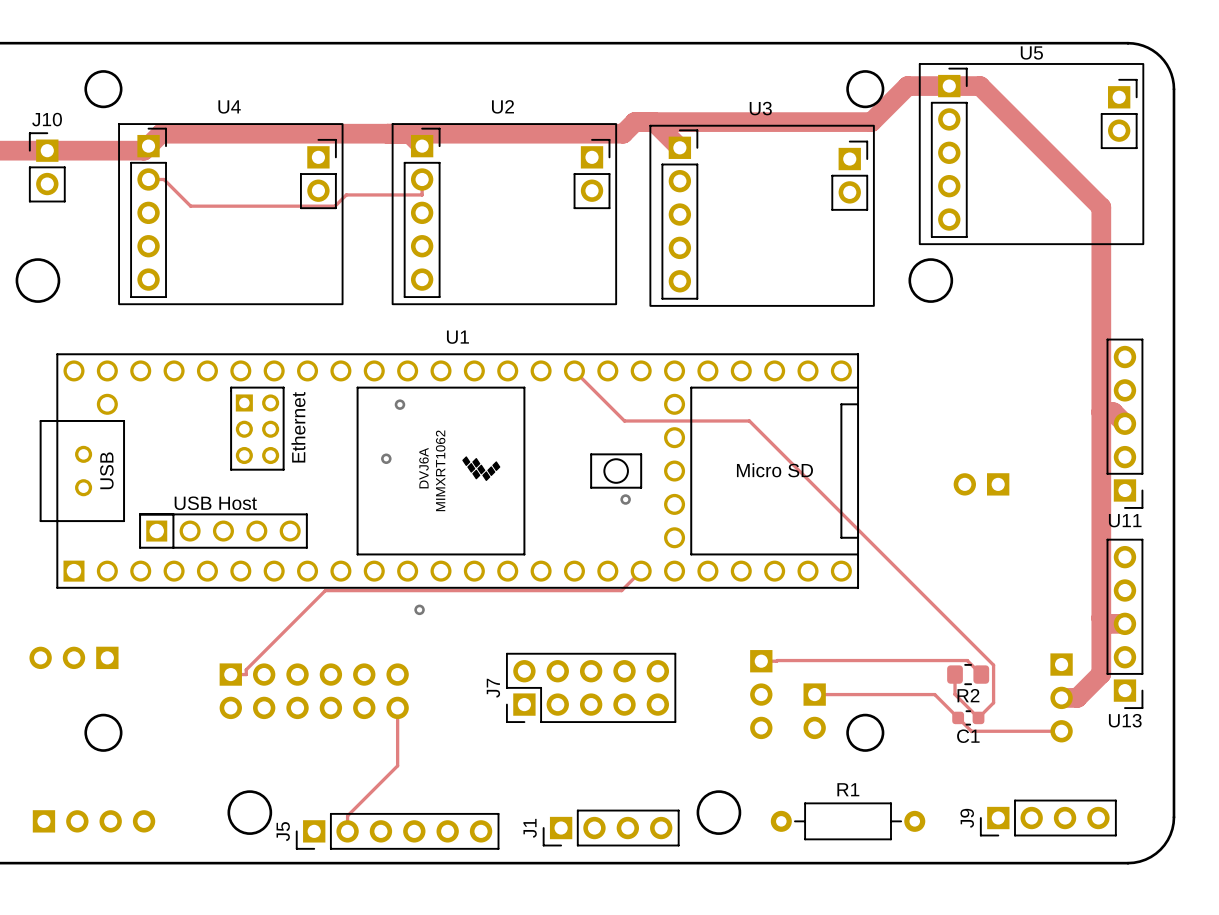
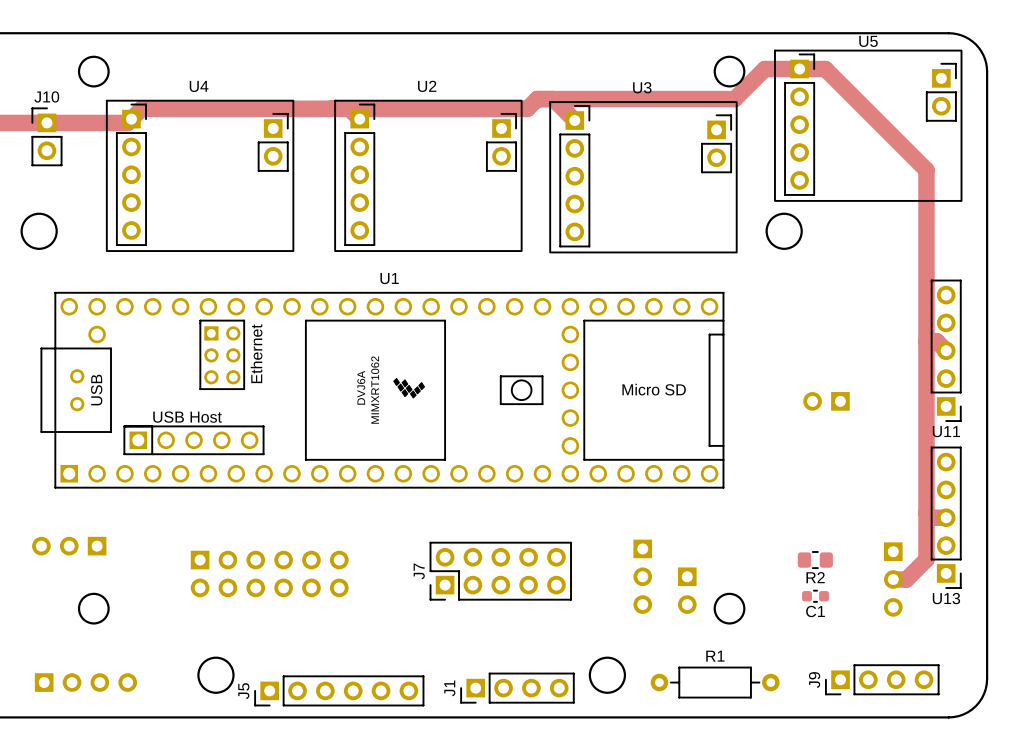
track: (148, 179) (164, 179) (190, 206) (335, 206) (346, 194) (422, 194) (422, 179) -> none
track: (574, 370) (624, 420) (749, 420) (993, 665) (993, 702) (978, 717) (955, 694) (955, 674) -> none
via: (399, 404) -> none
via: (386, 458) -> none
via: (625, 499) -> none
track: (641, 571) (621, 590) (325, 590) (246, 669) (246, 674) (230, 674) -> none
via: (419, 609) -> none
track: (761, 661) (967, 660) (981, 674) -> none
track: (814, 694) (934, 694) (971, 731) (1061, 731) -> none
track: (397, 707) (397, 765) (347, 815) (347, 831) -> none

